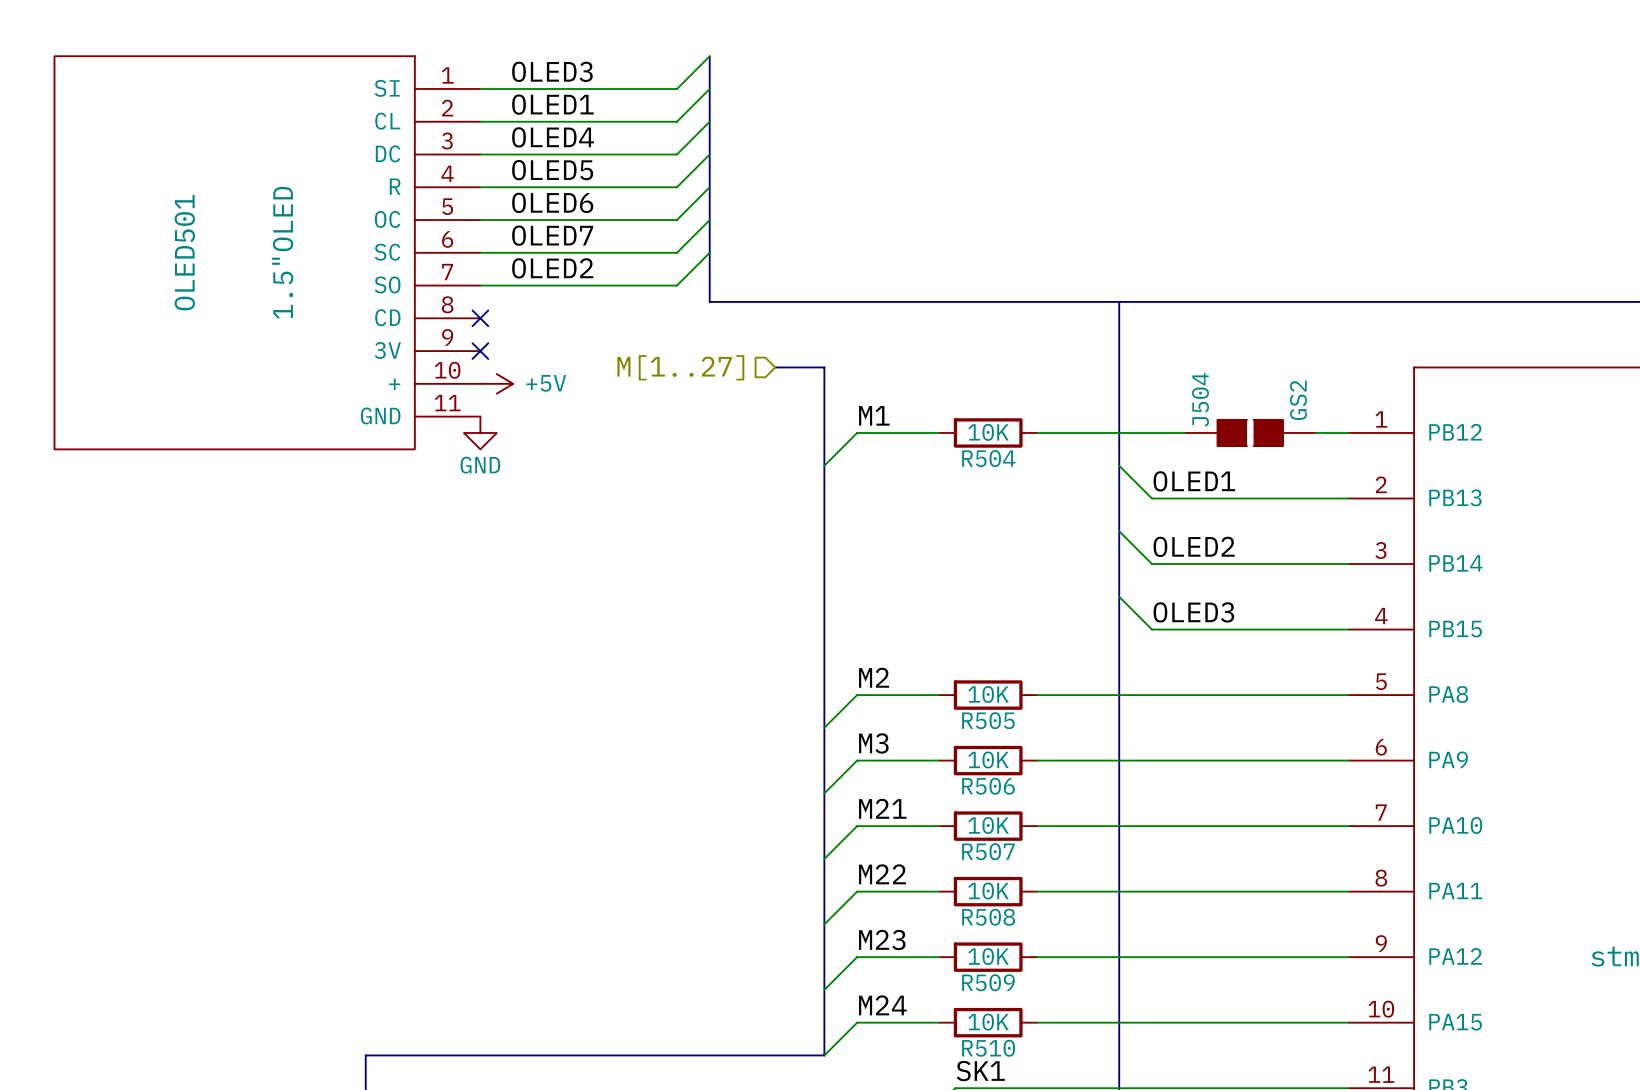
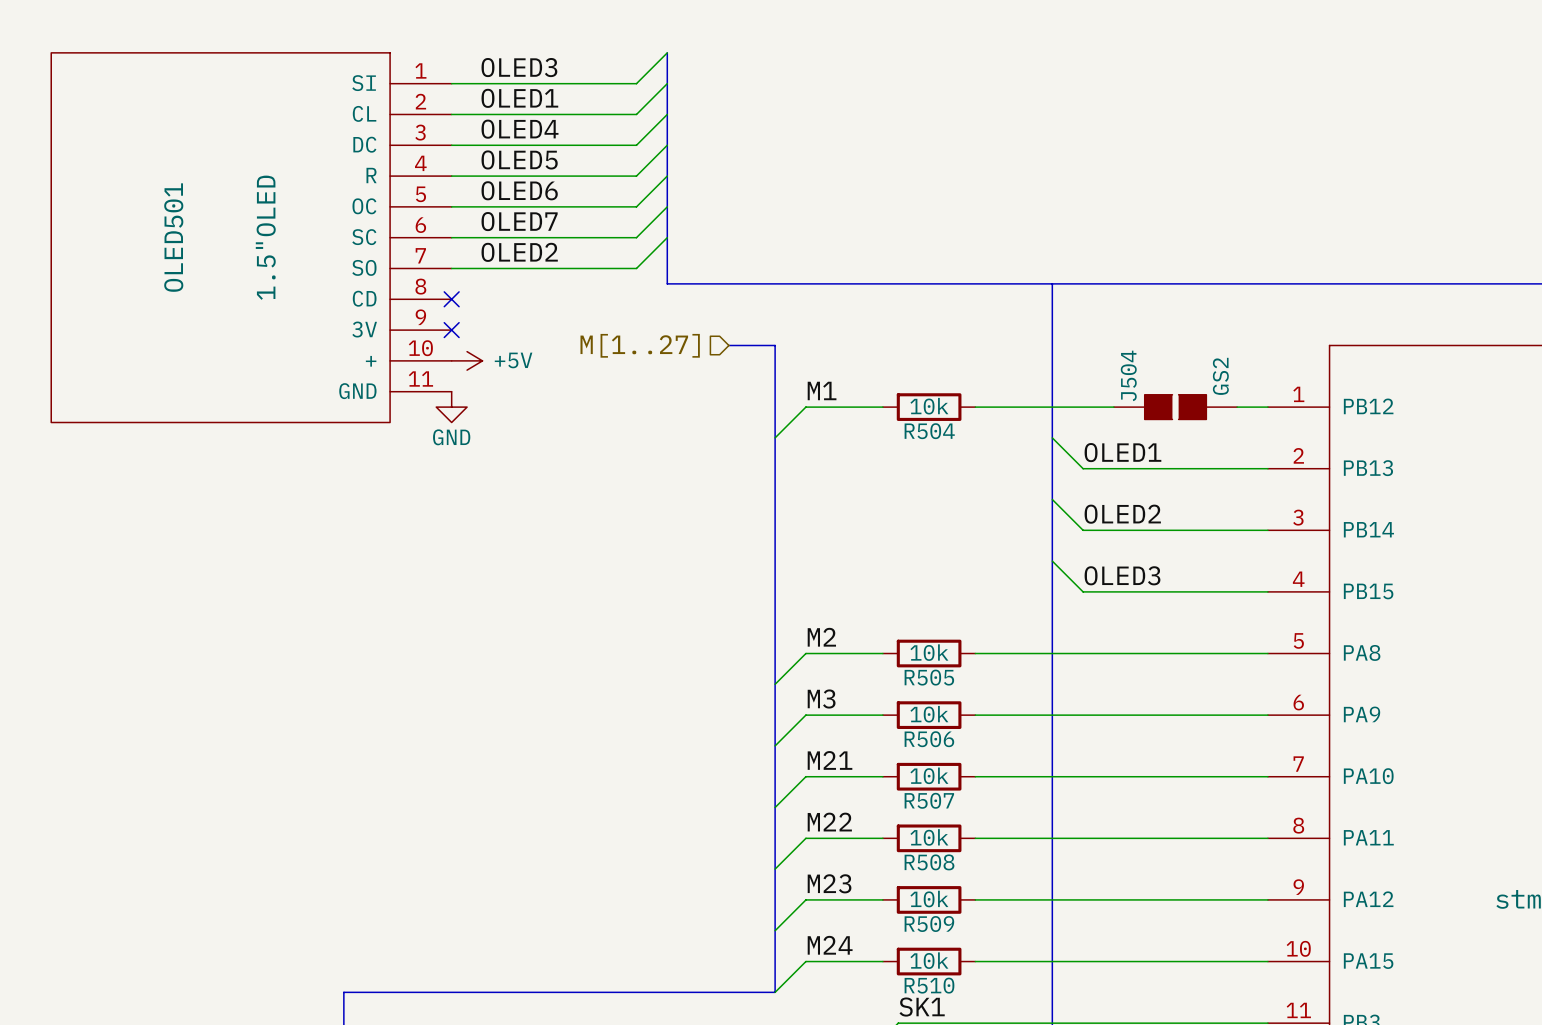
R504 value: 10K (988, 432) -> 10k (929, 406)
R505 value: 10K (988, 694) -> 10k (929, 652)
R506 value: 10K (988, 759) -> 10k (929, 714)
R507 value: 10K (988, 825) -> 10k (929, 775)
R508 value: 10K (988, 891) -> 10k (929, 837)
R509 value: 10K (988, 956) -> 10k (929, 899)
R510 value: 10K (988, 1022) -> 10k (929, 960)

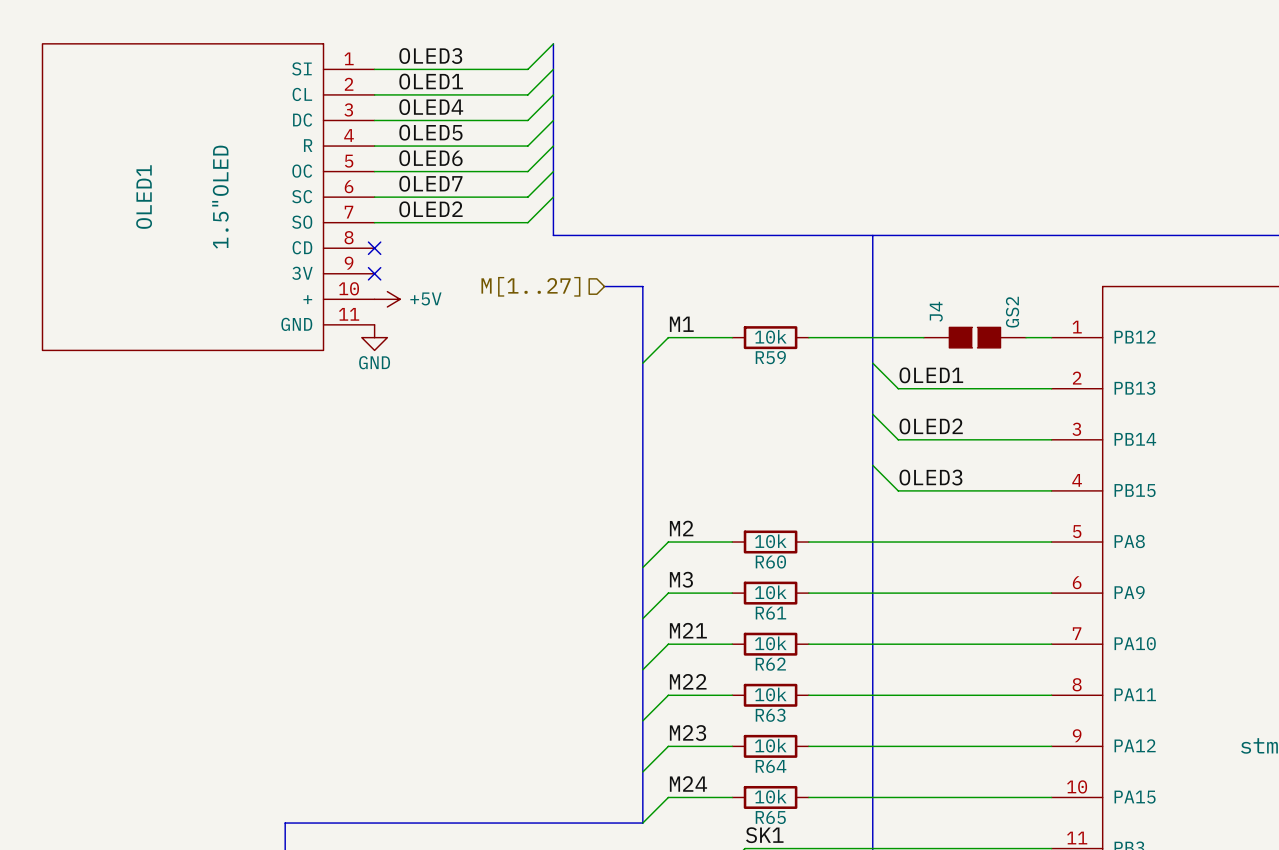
OLED501 name: OLED501 (173, 237) -> OLED1 (144, 197)
J504 name: J504 (1128, 375) -> J4 (936, 311)
R504 name: R504 (929, 431) -> R59 (770, 357)
R505 name: R505 (929, 677) -> R60 (770, 561)
R506 name: R506 (929, 739) -> R61 (770, 613)
R507 name: R507 (929, 800) -> R62 (770, 664)
R508 name: R508 (929, 862) -> R63 (770, 715)
R509 name: R509 (929, 924) -> R64 (771, 766)
R510 name: R510 (929, 985) -> R65 (770, 817)

